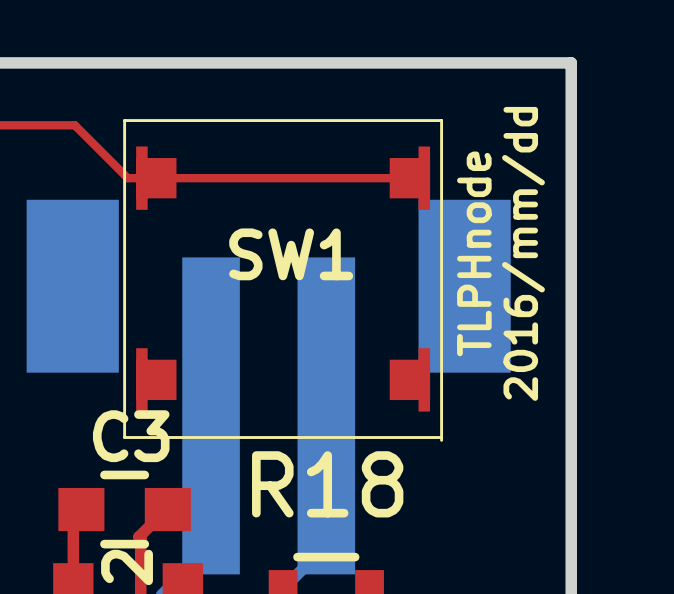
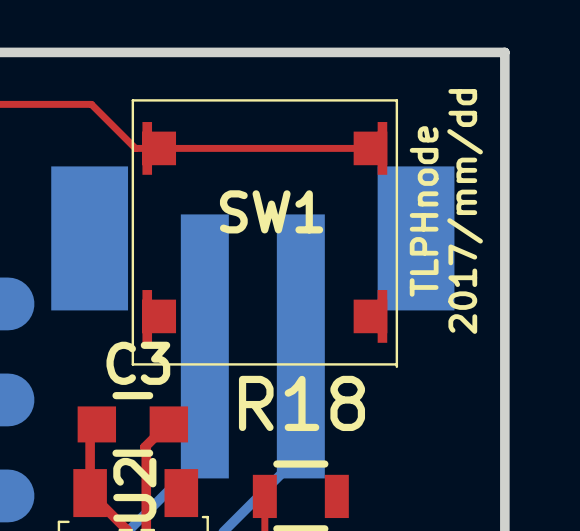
text: 2016/mm/dd (523, 253) -> 2017/mm/dd (465, 211)

